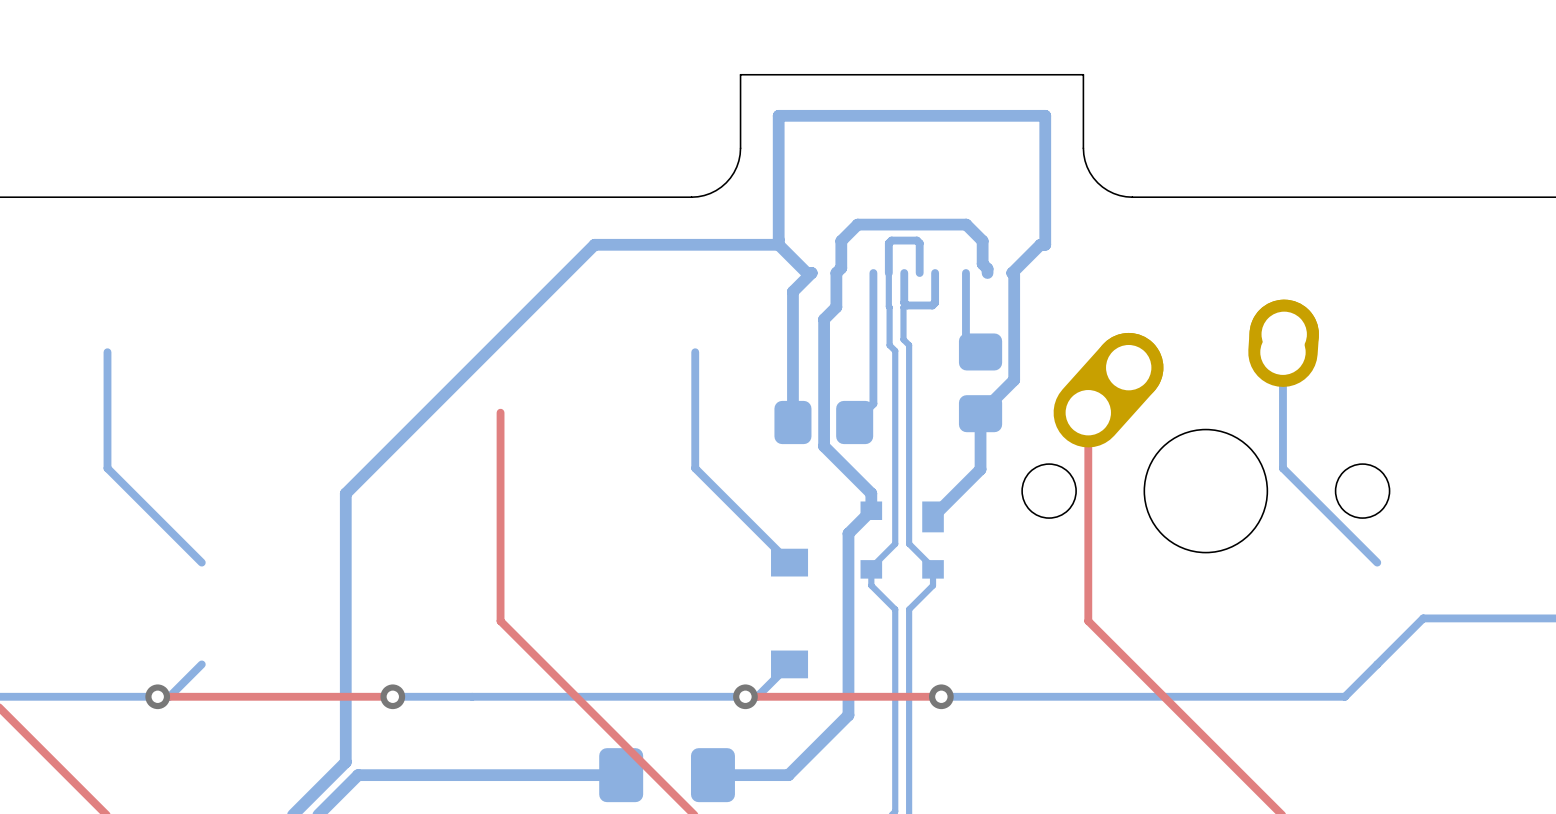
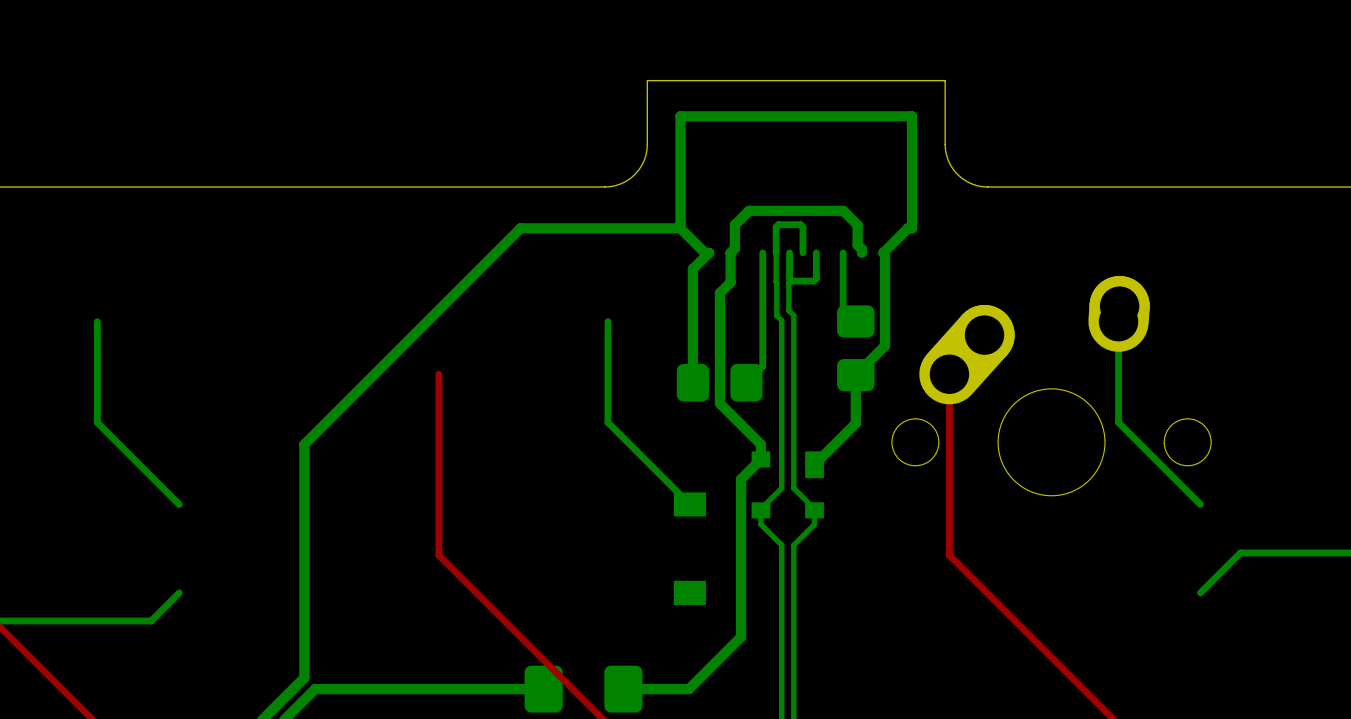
bottom track: (789, 664) (757, 696) (392, 696) -> none
bottom track: (1377, 664) (1344, 696) (941, 696) -> none
top track: (157, 696) (392, 696) -> none
via: (157, 696) -> none
via: (392, 696) -> none
top track: (745, 696) (941, 696) -> none
via: (745, 696) -> none
via: (941, 696) -> none

